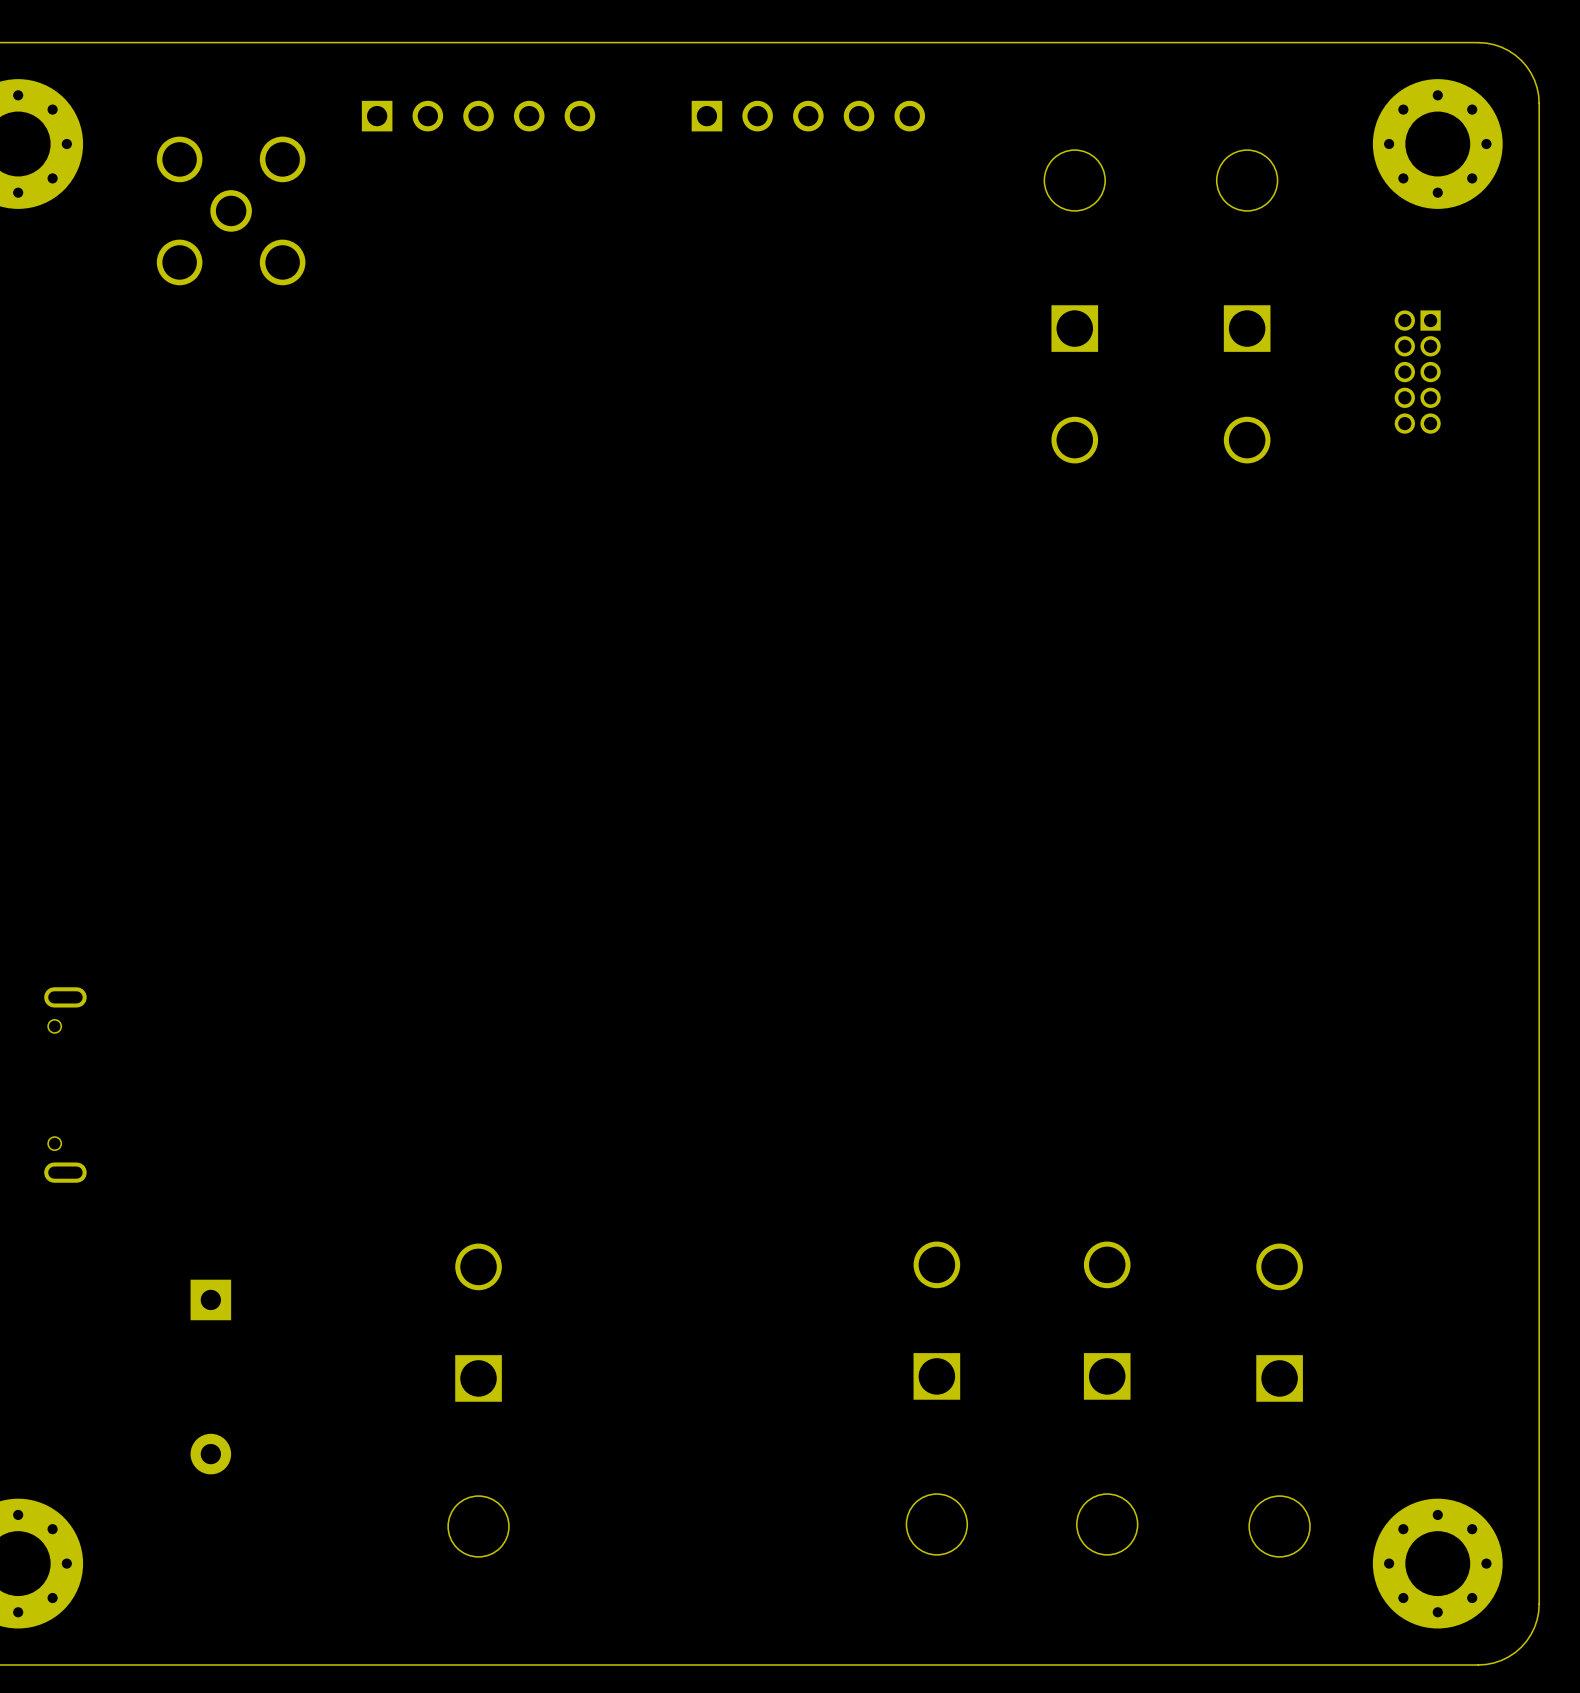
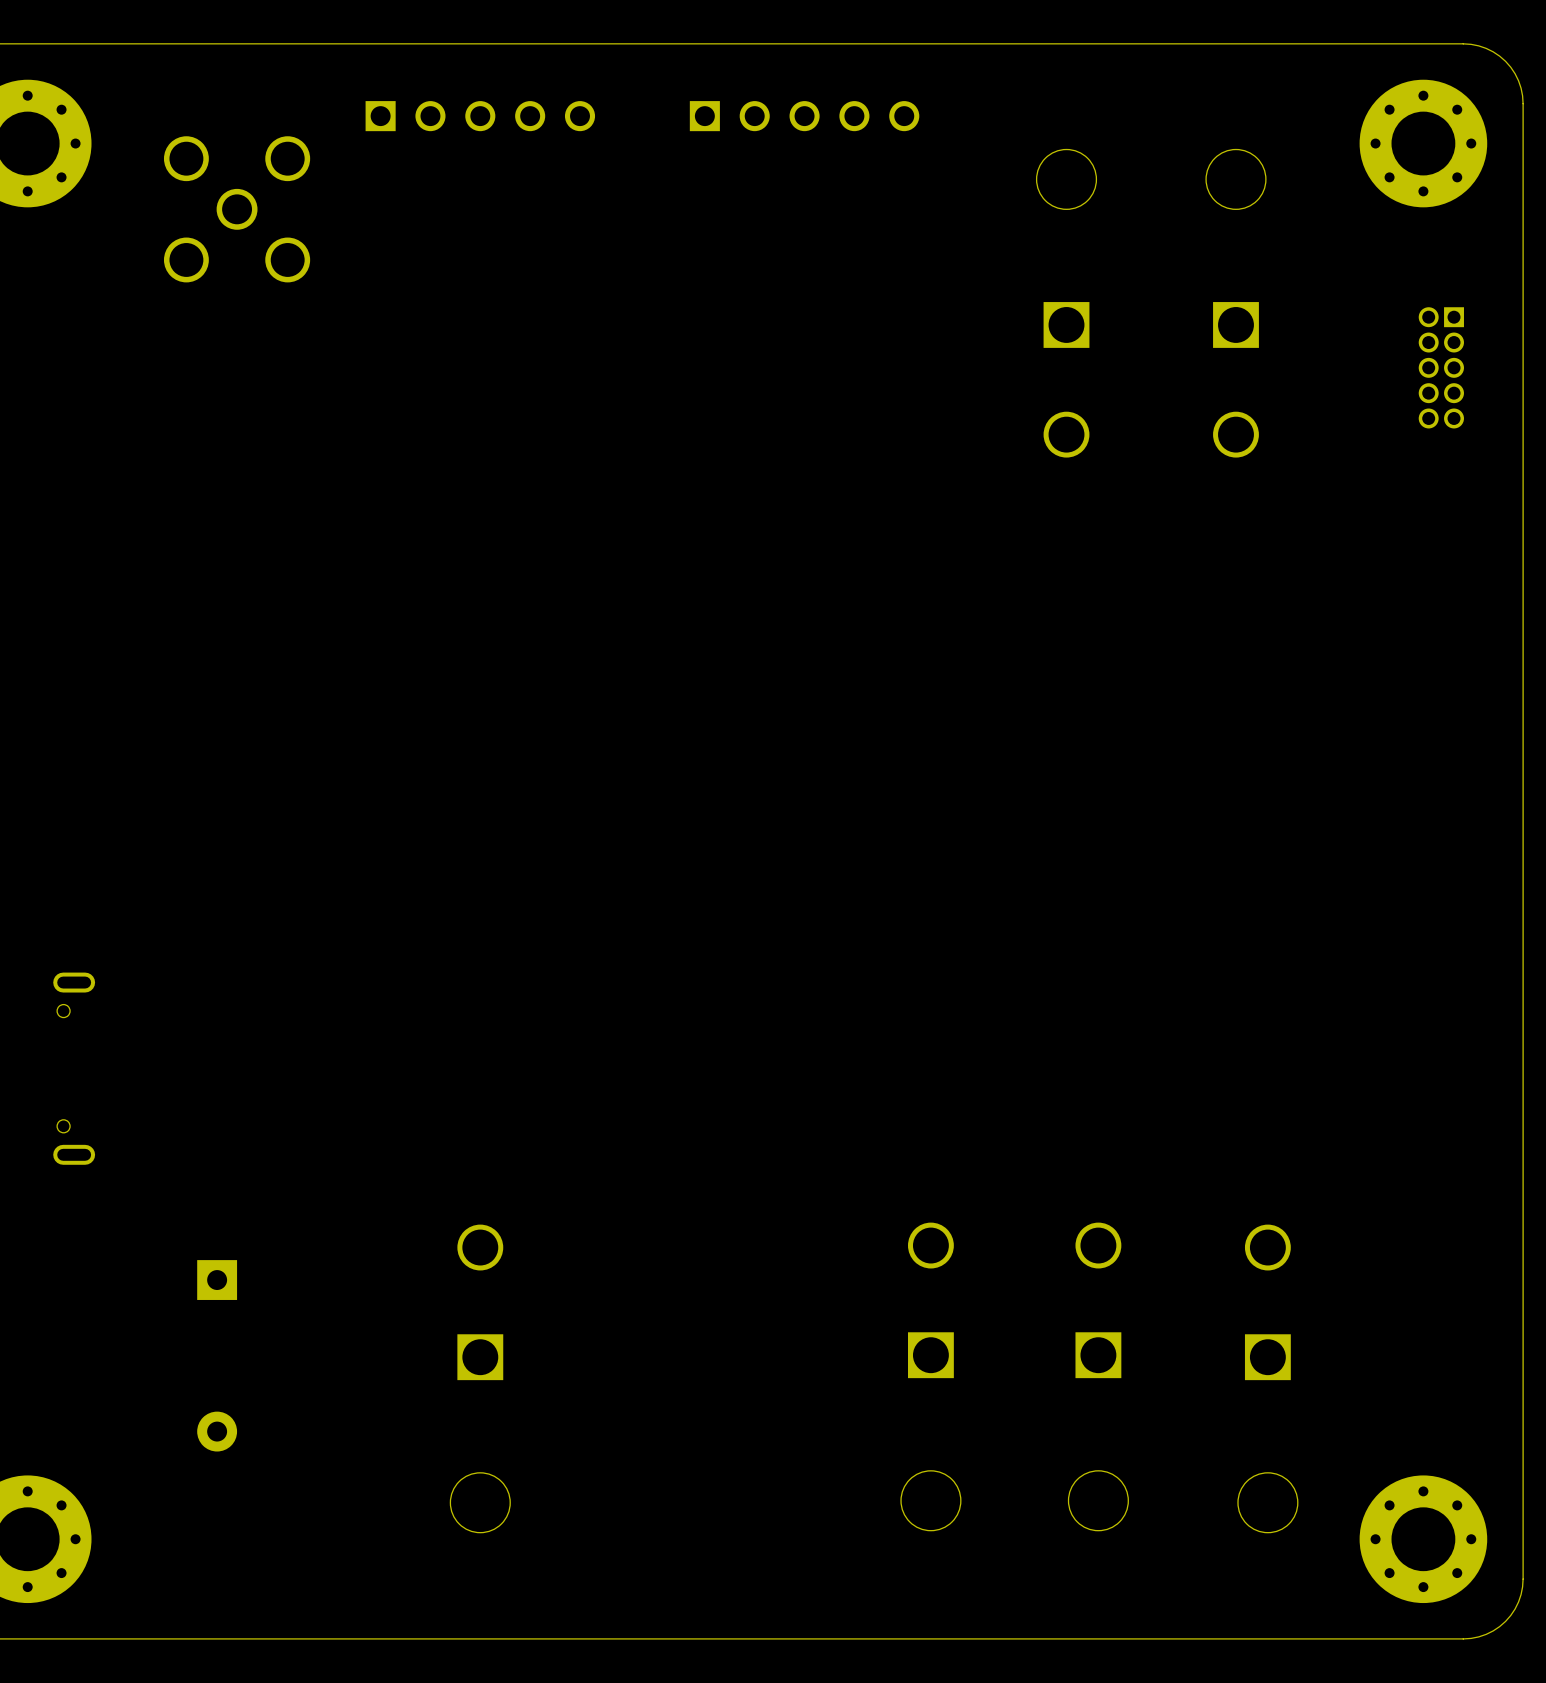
part position: (1417, 372) -> (1441, 367)

